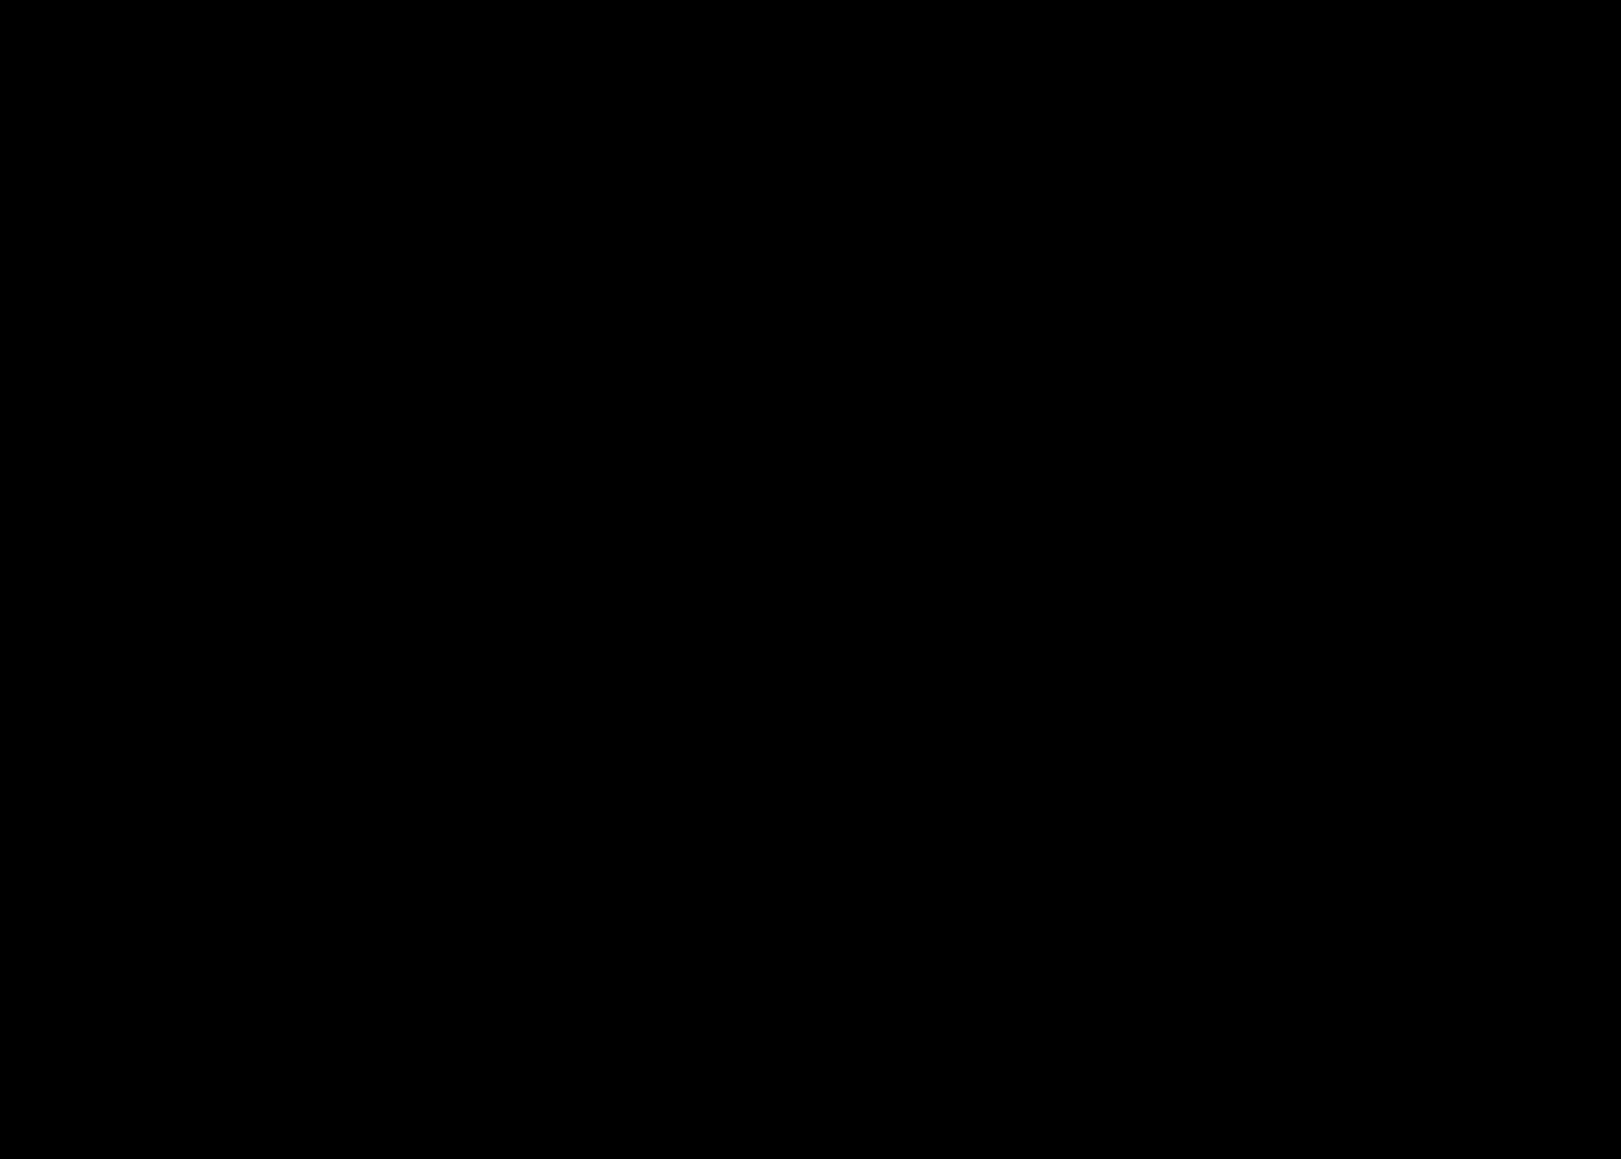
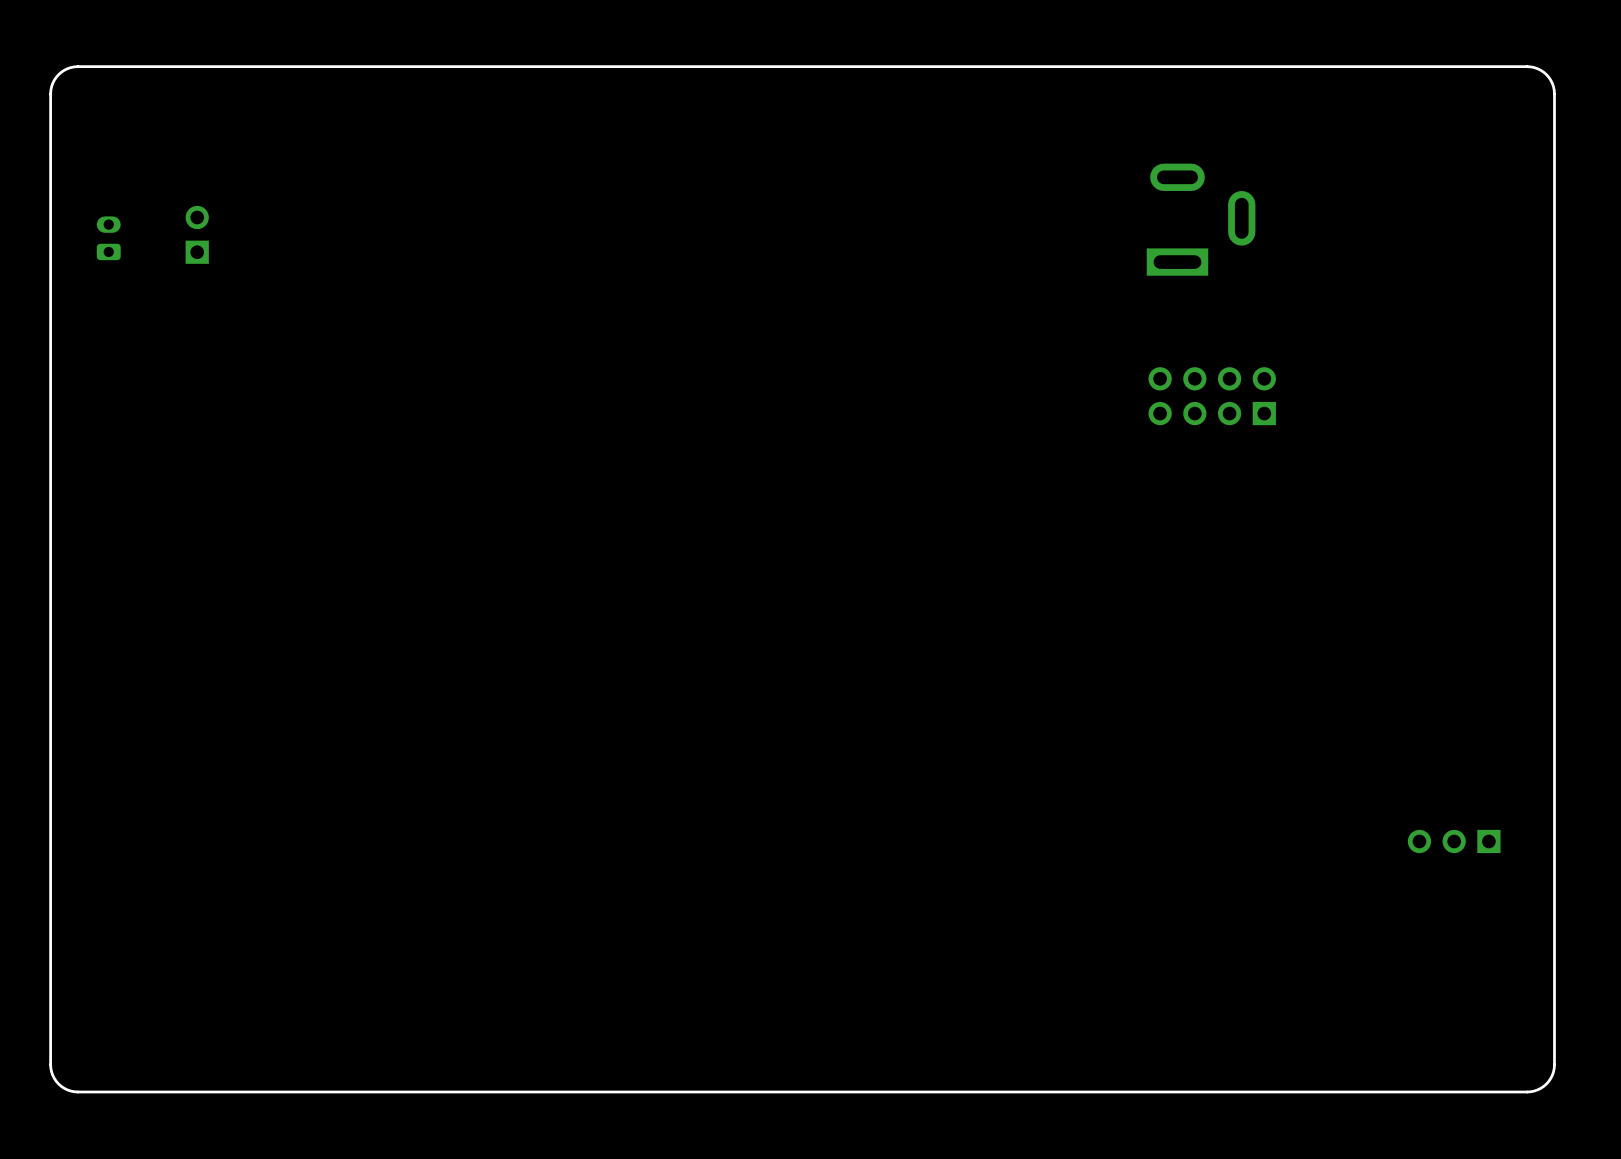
board edge: none -> (1527, 66) (77, 66) (61, 72) (52, 83) (50, 93) (50, 1064) (56, 1081) (67, 1089) (77, 1092) (1527, 1092) (1543, 1086) (1552, 1075) (1554, 1064) (1554, 93) (1552, 83) (1546, 74) (1537, 68) (1527, 66)
part: none -> (1201, 219)
part: none -> (197, 234)
part: none -> (108, 238)
part: none -> (1212, 396)
part: none -> (1454, 841)

